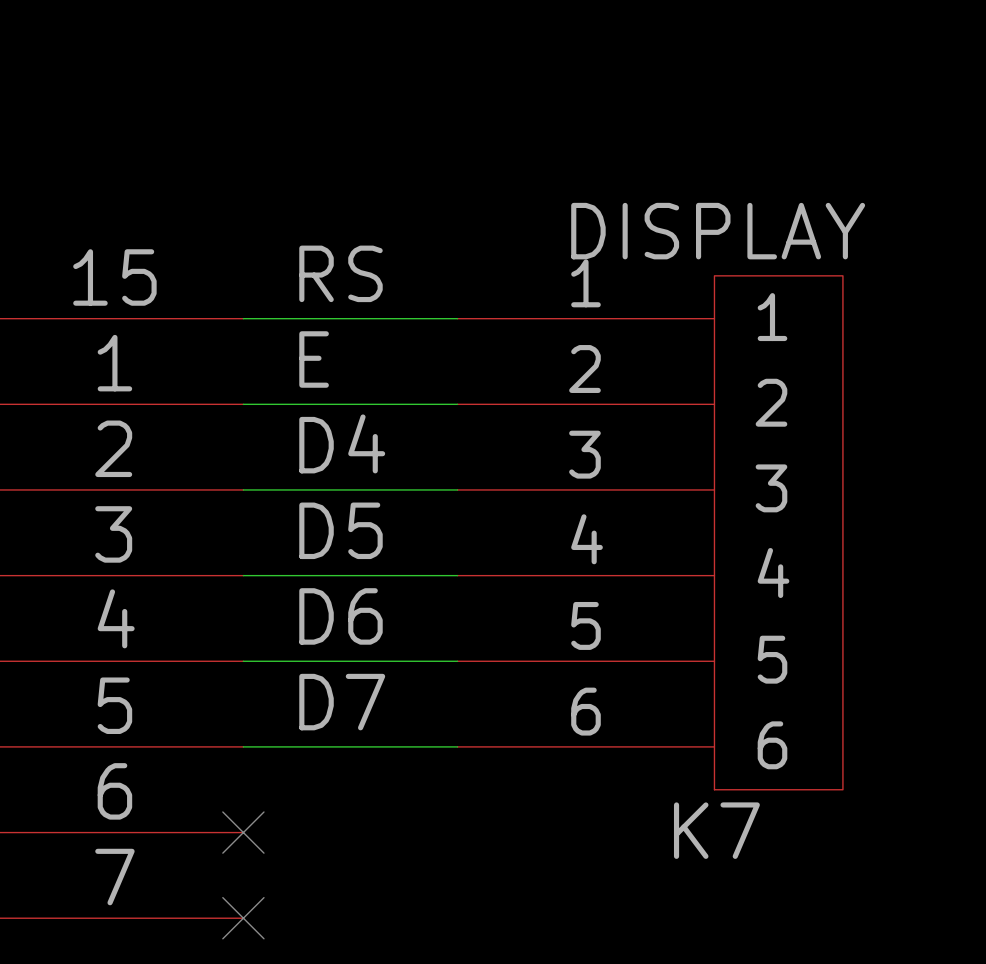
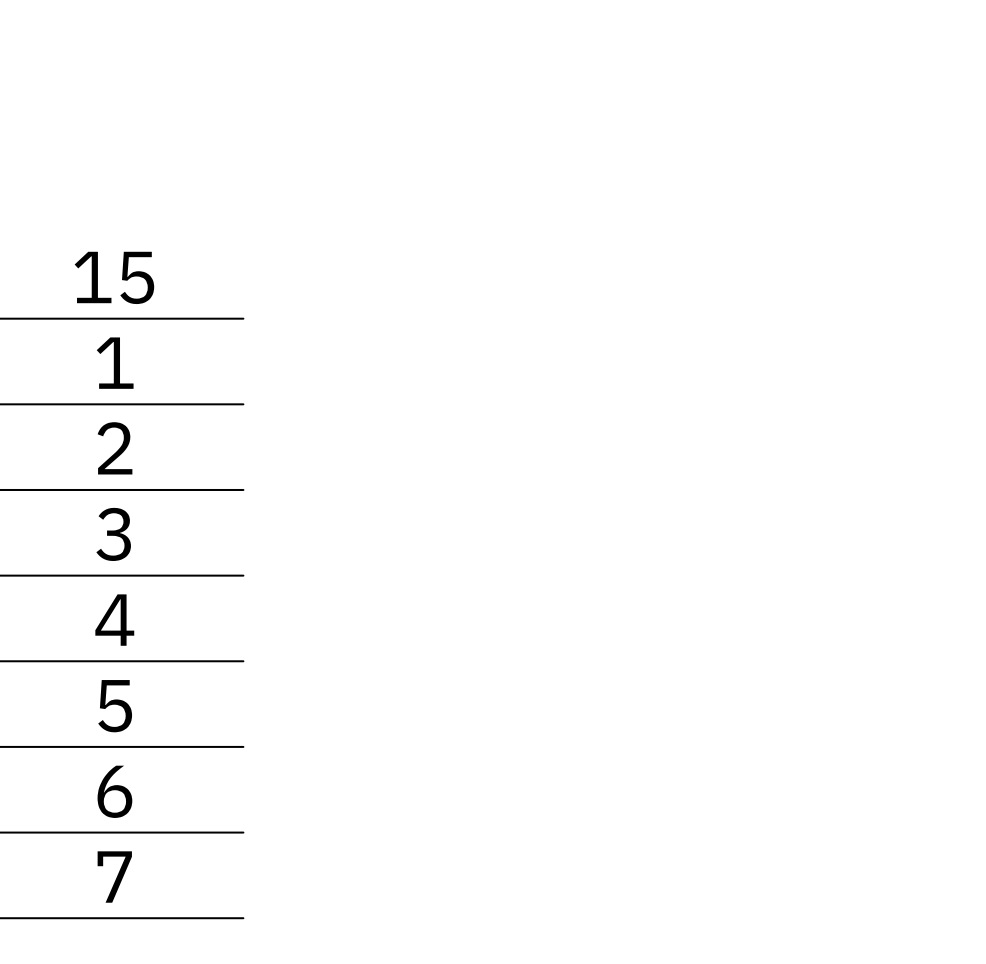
label: RS (340, 273) -> none
wire: (243, 318) (457, 318) -> none
label: E (314, 359) -> none
wire: (243, 404) (457, 404) -> none
label: D4 (342, 443) -> none
wire: (243, 489) (457, 489) -> none
label: D5 (340, 530) -> none
K7: DISPLAY (650, 532) -> none
wire: (243, 575) (457, 575) -> none
label: D6 (340, 616) -> none
wire: (243, 661) (457, 661) -> none
label: D7 (342, 702) -> none
wire: (243, 746) (457, 746) -> none
no-connect mark: (243, 832) -> none
no-connect mark: (243, 918) -> none

